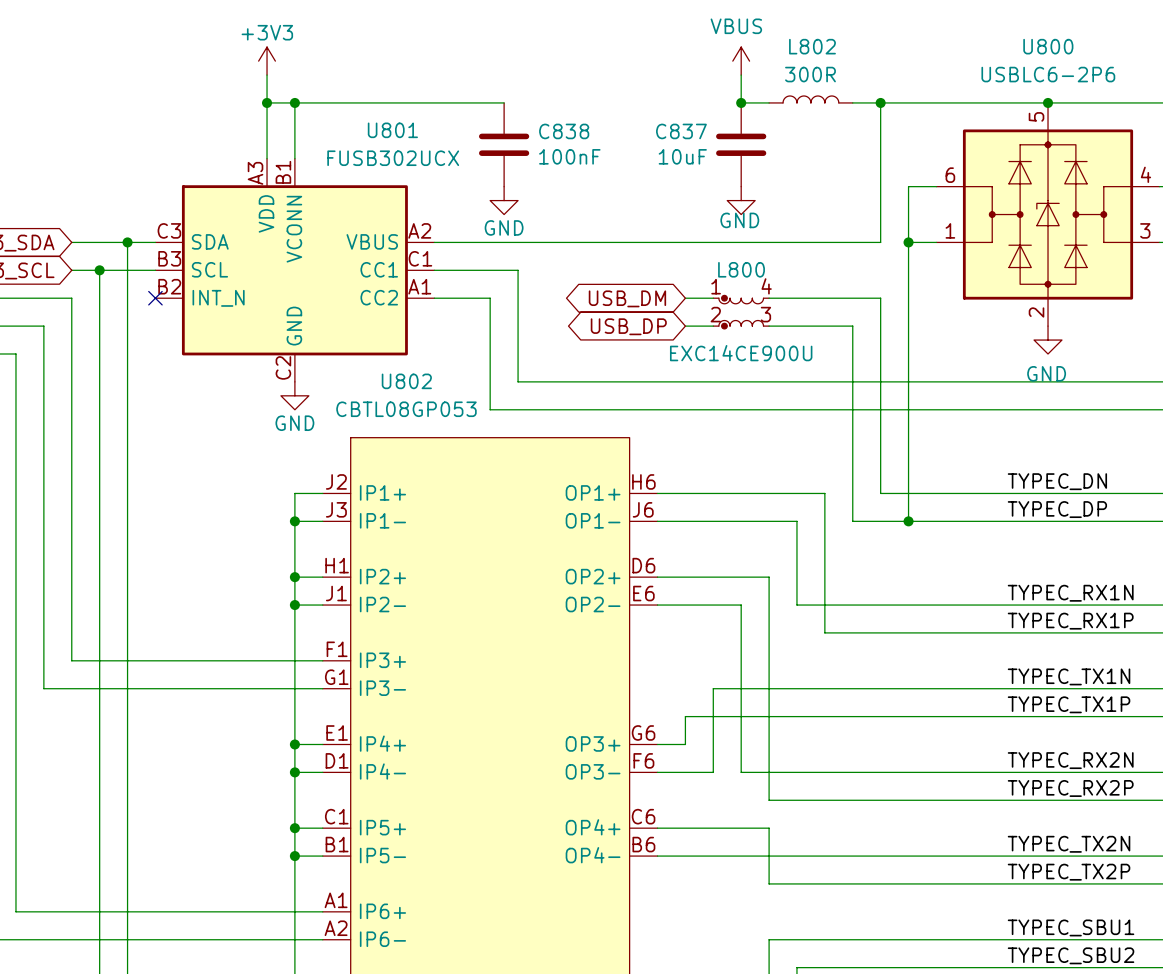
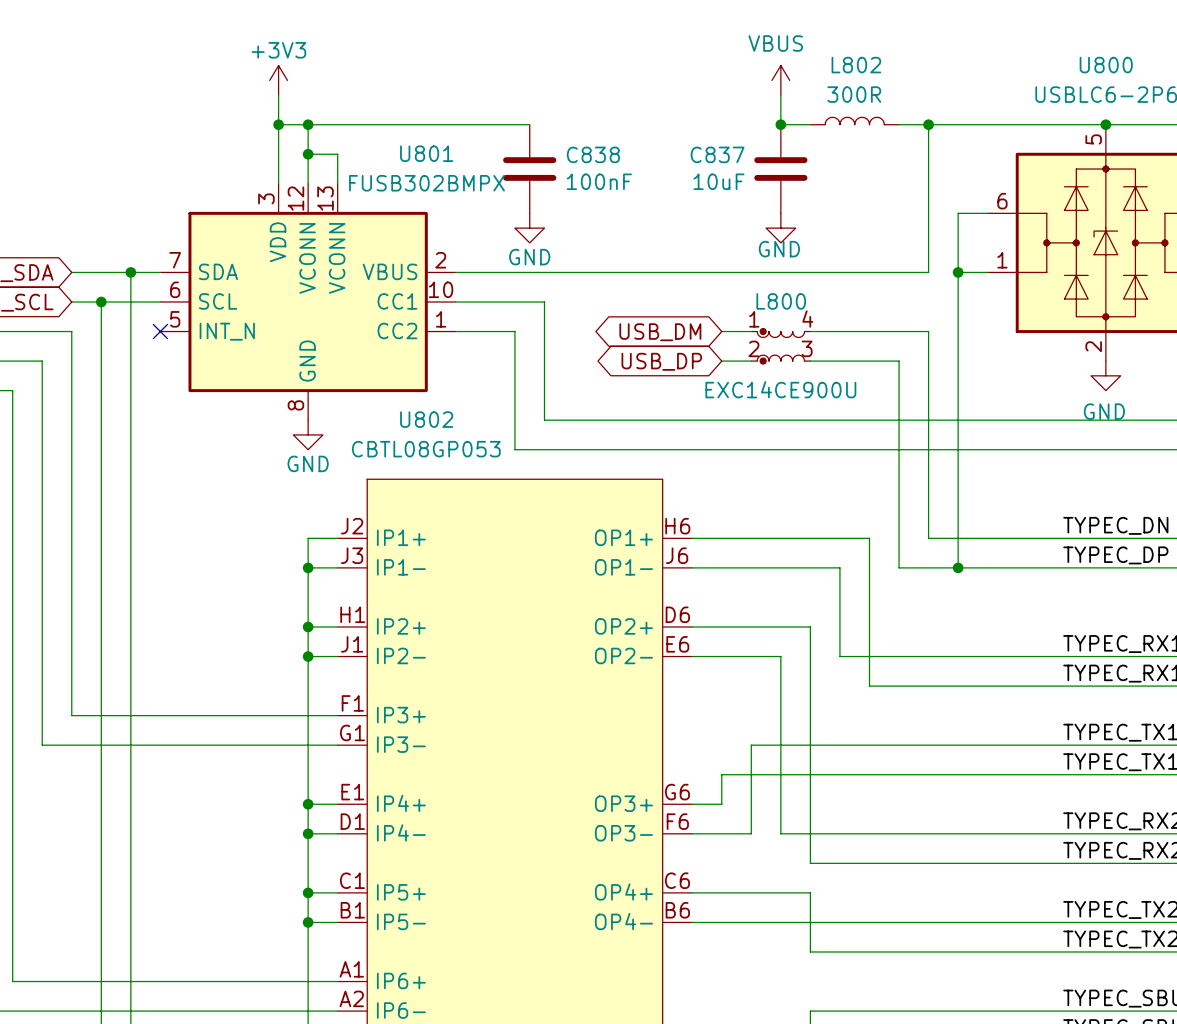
wire: none -> (308, 154) (337, 154) (337, 183)
junction: none -> (308, 154)
U801 symbol: [155, 158, 435, 382] -> [160, 183, 456, 421]
U801 value: FUSB302UCX (393, 158) -> FUSB302BMPX (427, 183)

